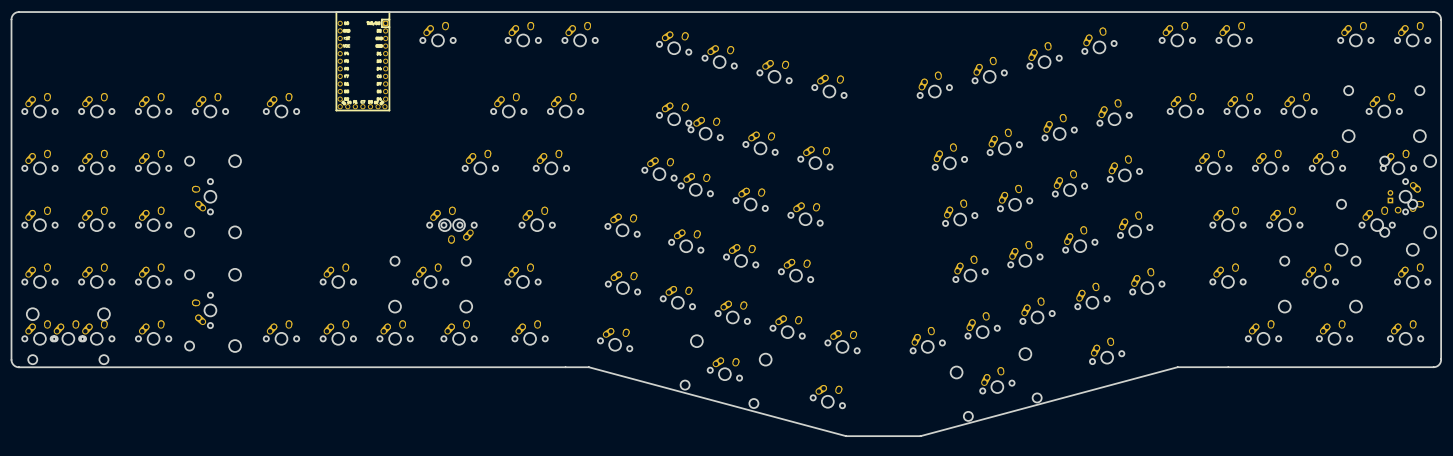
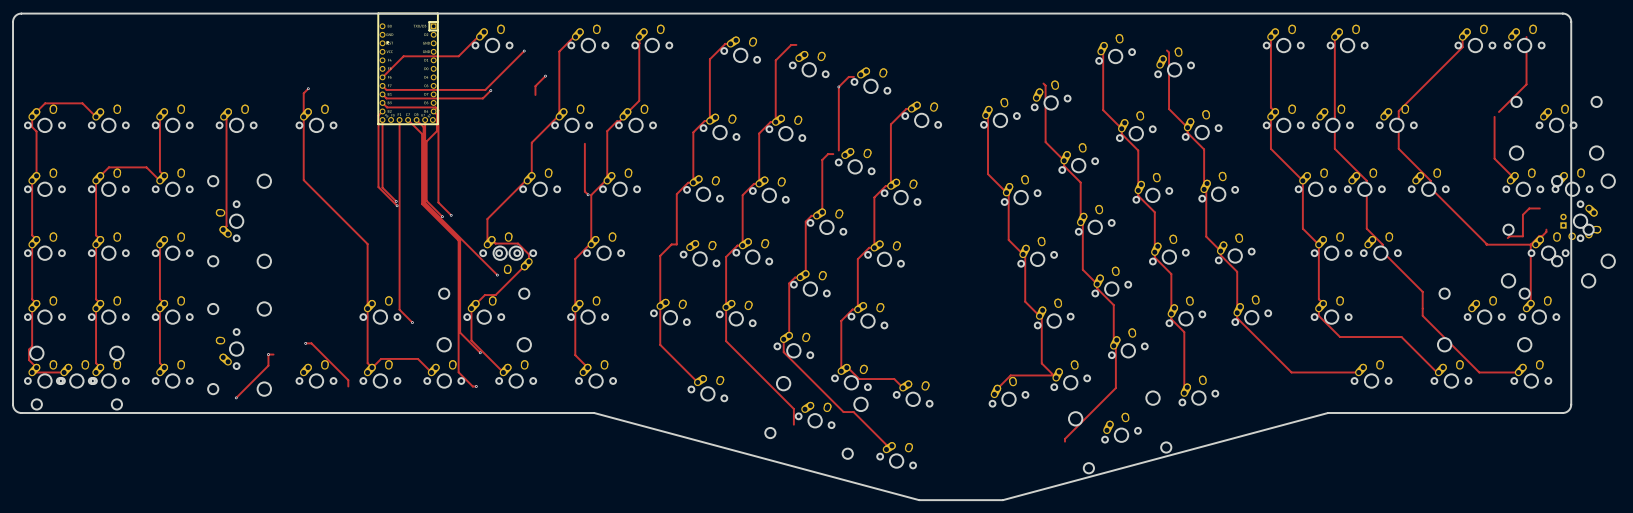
board edge: (19, 12) (13, 14) (11, 19) (11, 359) (16, 366) (588, 367) (846, 436) (920, 436) (1177, 367) (1433, 367) (1438, 365) (1441, 360) (1440, 18) (1434, 12) (1389, 12) -> (21, 13) (15, 16) (13, 21) (13, 404) (17, 411) (594, 412) (919, 500) (1002, 500) (1328, 412) (1562, 412) (1567, 411) (1571, 404) (1571, 21) (1568, 16) (1562, 13)
track: none -> (479, 36) (458, 56) (403, 56) (382, 77)
track: none -> (575, 36) (559, 51) (559, 116) (531, 142) (531, 175)
track: none -> (639, 36) (639, 100) (607, 131) (607, 180) (591, 195) (591, 244) (575, 258) (575, 355) (587, 367)
track: none -> (1270, 37) (1270, 107) (1275, 111)
track: none -> (1334, 37) (1334, 148) (1366, 180) (1366, 228) (1382, 244) (1382, 251) (1422, 291) (1422, 315) (1479, 372) (1518, 372)
track: none -> (1462, 37) (1462, 47) (1398, 111) (1398, 148) (1430, 180) (1430, 188) (1486, 244) (1530, 244)
track: none -> (1526, 37) (1526, 84) (1498, 111)
part: none -> (1283, 38)
part: (1177, 34) -> none
part: none -> (1347, 38)
part: (1234, 34) -> none
part: none -> (1475, 38)
part: (1412, 34) -> none
track: none -> (730, 43) (725, 43) (709, 59) (709, 121) (704, 121) (693, 132) (693, 182) (688, 182) (676, 194) (676, 244) (671, 244) (660, 255) (660, 344) (697, 382)
track: none -> (796, 44) (791, 44) (775, 60) (775, 122) (770, 122) (759, 133) (759, 183) (754, 183) (742, 195) (742, 245) (737, 245) (726, 256) (726, 341) (793, 408) (793, 424)
part: (1099, 40) -> none
part position: (674, 43) -> (740, 49)
part: none -> (1115, 48)
track: none -> (1166, 50) (1169, 52) (1169, 109) (1187, 127) (1187, 132) (1204, 149) (1206, 236) (1237, 271) (1237, 318) (1291, 372) (1358, 372)
track: none -> (524, 51) (485, 89) (386, 89) (382, 85)
via: none -> (524, 51)
track: none -> (1101, 51) (1103, 53) (1103, 110) (1121, 128) (1121, 134) (1138, 150) (1138, 195) (1154, 212) (1154, 257) (1171, 274) (1171, 319) (1184, 332) (1184, 393)
track: none -> (545, 76) (535, 86) (535, 94)
via: none -> (545, 76)
track: none -> (853, 76) (848, 76) (838, 86) (838, 150)
part: (989, 70) -> none
track: none -> (1043, 83) (1045, 85) (1045, 142) (1064, 160) (1064, 166) (1080, 182) (1082, 269) (1097, 284) (1097, 288) (1113, 305) (1115, 388) (1065, 438) (1065, 441)
via: none -> (838, 86)
track: none -> (308, 88) (303, 93) (303, 180) (367, 244) (367, 363) (372, 367)
via: none -> (308, 88)
track: none -> (490, 90) (482, 98) (386, 98) (382, 94)
via: none -> (490, 90)
part position: (829, 86) -> (921, 114)
track: none -> (382, 102) (387, 107) (435, 107) (438, 110) (438, 202) (451, 215)
track: none -> (911, 108) (906, 108) (890, 124) (890, 186) (885, 186) (874, 197) (874, 247) (869, 247) (857, 259) (857, 309) (852, 309) (841, 320) (841, 371)
track: none -> (36, 111) (45, 103) (82, 103) (96, 116)
track: none -> (382, 111) (378, 115) (378, 187) (397, 205)
track: none -> (433, 111) (436, 114) (436, 131) (426, 141) (426, 200) (442, 216)
part: none -> (1000, 112)
track: none -> (985, 115) (988, 117) (988, 174) (1008, 194) (1008, 239) (1025, 256) (1025, 301) (1041, 318) (1041, 363) (1056, 377)
track: none -> (32, 116) (32, 127) (36, 131) (36, 175)
track: none -> (159, 116) (159, 171) (164, 175)
track: none -> (223, 116) (226, 119) (226, 226) (223, 229)
track: none -> (1270, 116) (1270, 148) (1302, 180) (1302, 228) (1318, 244) (1318, 299) (1323, 303)
track: none -> (1494, 116) (1494, 158) (1514, 178) (1514, 180)
part: none -> (1283, 118)
part: (1299, 105) -> none
track: none -> (382, 119) (382, 187) (396, 201)
track: none -> (399, 119) (399, 309) (412, 322)
track: none -> (408, 119) (422, 133) (422, 204) (458, 240) (458, 372) (472, 386) (476, 386)
track: none -> (416, 119) (423, 126) (423, 203) (460, 240) (460, 332) (480, 352)
track: none -> (425, 119) (425, 202) (497, 275)
part: none -> (720, 126)
part: none -> (1136, 126)
part: (1114, 112) -> none
part: none -> (785, 127)
part: (674, 114) -> none
track: none -> (584, 143) (584, 191) (588, 194)
part position: (1059, 127) -> (1202, 125)
part: (705, 128) -> none
track: none -> (833, 154) (828, 154) (822, 159) (822, 212)
part: (1004, 141) -> none
track: none -> (100, 175) (108, 167) (146, 167) (159, 180)
part position: (949, 156) -> (1078, 158)
part position: (815, 157) -> (901, 191)
track: none -> (32, 180) (32, 235) (36, 239)
track: none -> (96, 180) (96, 235) (100, 239)
track: none -> (527, 180) (487, 219) (487, 244)
part: none -> (1315, 182)
part position: (1327, 162) -> (1523, 182)
part: none -> (1218, 186)
part: none -> (703, 188)
part: none -> (1152, 187)
part: none -> (769, 189)
part: (1124, 168) -> none
part: (659, 169) -> none
part: none -> (1021, 190)
via: none -> (588, 194)
via: none -> (396, 201)
via: none -> (397, 205)
part: (1069, 183) -> none
part: (695, 184) -> none
track: none -> (1539, 208) (1529, 208) (1522, 214) (1522, 236) (1509, 236) (1507, 238)
via: none -> (451, 215)
track: none -> (816, 215) (811, 215) (805, 221) (805, 273)
via: none -> (442, 216)
part: none -> (1095, 219)
part: (1015, 198) -> none
part position: (750, 199) -> (826, 221)
track: none -> (1546, 229) (1542, 235) (1539, 235) (1530, 244)
part: (960, 212) -> none
track: none -> (491, 239) (495, 243) (518, 243) (528, 254) (528, 261) (495, 295) (484, 295) (471, 308) (471, 340) (503, 372)
part: (805, 214) -> none
track: none -> (32, 244) (32, 299) (36, 303)
track: none -> (96, 244) (96, 299) (100, 303)
track: none -> (159, 244) (159, 299) (164, 303)
track: none -> (1530, 244) (1530, 304) (1526, 308)
part: none -> (1331, 246)
part: (1284, 218) -> none
part: none -> (1235, 248)
part: none -> (1169, 249)
part: none -> (752, 251)
part: none -> (1037, 251)
part: (1135, 224) -> none
part: none -> (884, 253)
part: (1080, 239) -> none
part: (686, 241) -> none
via: none -> (497, 275)
track: none -> (800, 277) (795, 277) (789, 283) (789, 335)
part: none -> (1111, 281)
part: none -> (810, 283)
part: (1025, 254) -> none
part: (741, 255) -> none
part: (970, 268) -> none
part: (796, 270) -> none
track: none -> (32, 308) (32, 346) (29, 349) (29, 360) (36, 367)
track: none -> (96, 308) (96, 363) (100, 367)
track: none -> (159, 308) (159, 363) (164, 367)
track: none -> (1318, 308) (1318, 315) (1340, 337) (1401, 337) (1438, 372)
part: none -> (1251, 310)
part: none -> (1331, 310)
part: (1228, 275) -> none
part: none -> (1539, 310)
part: (1412, 275) -> none
part: none -> (1185, 311)
part: none -> (670, 311)
part: none -> (736, 313)
part: none -> (1054, 313)
part: none -> (867, 315)
part: (1147, 281) -> none
part: (622, 282) -> none
via: none -> (412, 322)
part: (1092, 296) -> none
part: (677, 297) -> none
track: none -> (783, 339) (783, 352) (843, 412) (853, 412) (886, 444) (886, 449)
track: none -> (305, 343) (311, 343) (348, 380) (348, 386)
via: none -> (305, 343)
part: none -> (1128, 343)
part: none -> (793, 345)
part: (1037, 310) -> none
part: (732, 312) -> none
via: none -> (480, 352)
via: none -> (268, 354)
track: none -> (273, 354) (268, 354) (268, 365) (236, 397)
part: (982, 325) -> none
track: none -> (846, 367) (859, 379) (894, 379) (903, 387)
part: (787, 327) -> none
track: none -> (32, 372) (64, 372)
track: none -> (367, 372) (381, 358) (418, 358) (431, 372)
part: none -> (1371, 373)
part: (1263, 332) -> none
part: none -> (1451, 373)
part: (1334, 332) -> none
part: none -> (1531, 373)
part: (1405, 332) -> none
track: none -> (1053, 375) (1010, 375) (994, 391) (994, 394)
part: none -> (1070, 375)
part: none -> (851, 376)
part position: (615, 339) -> (707, 388)
part: (927, 340) -> none
part: (842, 341) -> none
via: none -> (476, 386)
part: none -> (1198, 390)
part: none -> (1009, 391)
part: none -> (913, 393)
part: (1107, 350) -> none
via: none -> (236, 397)
part: (827, 396) -> none
part: none -> (896, 455)

